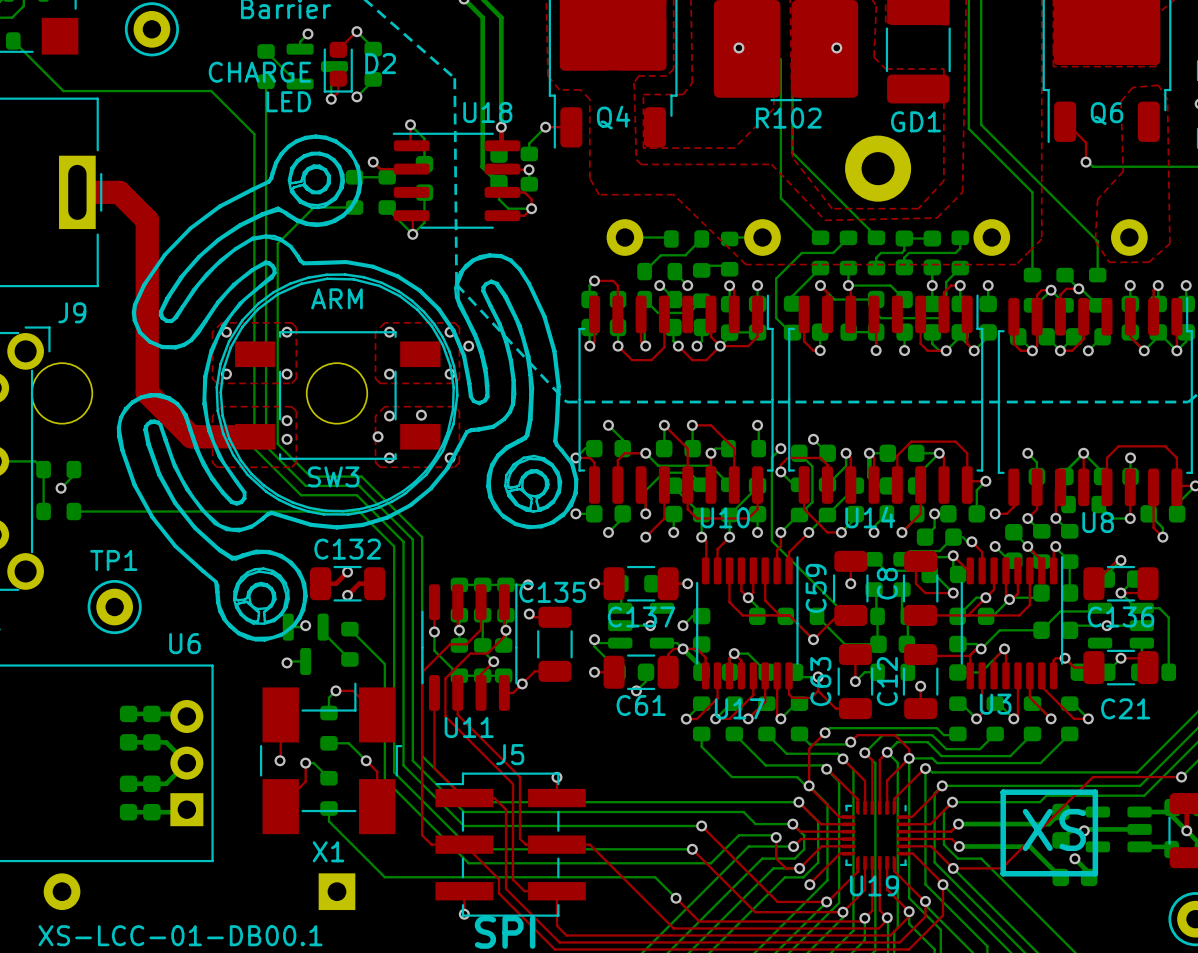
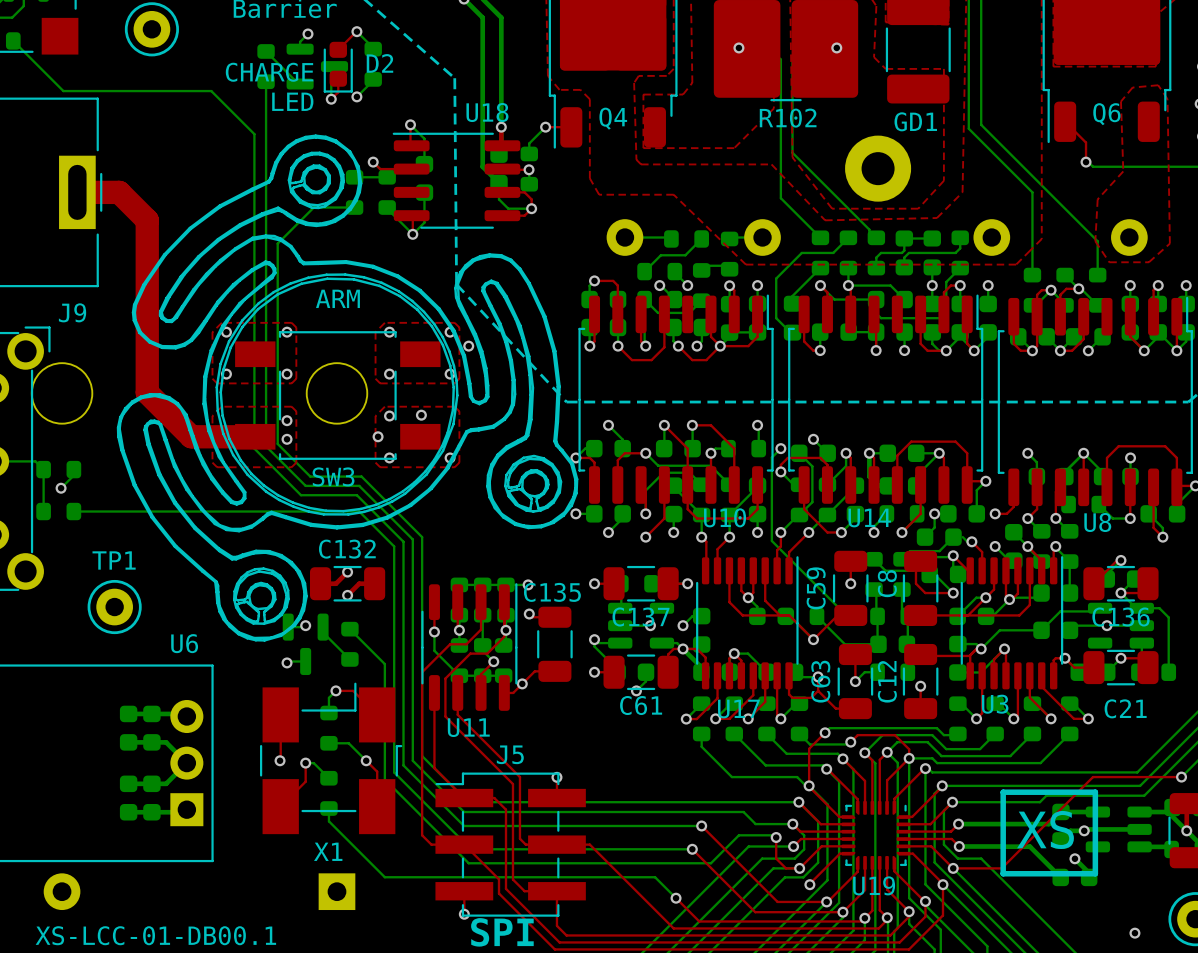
via: none -> (1134, 933)

